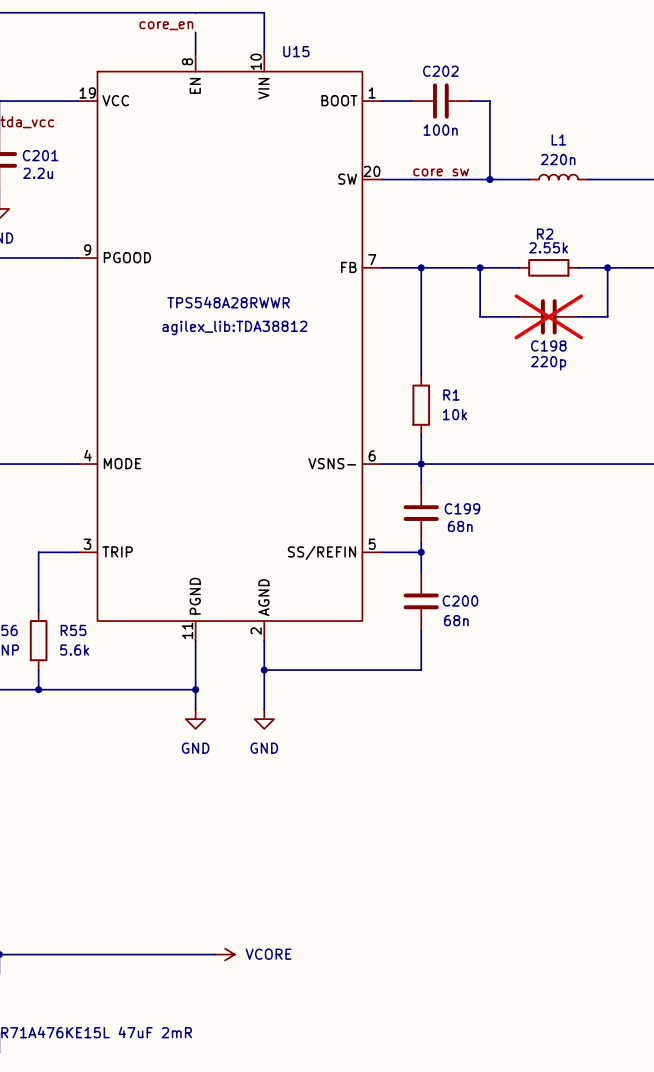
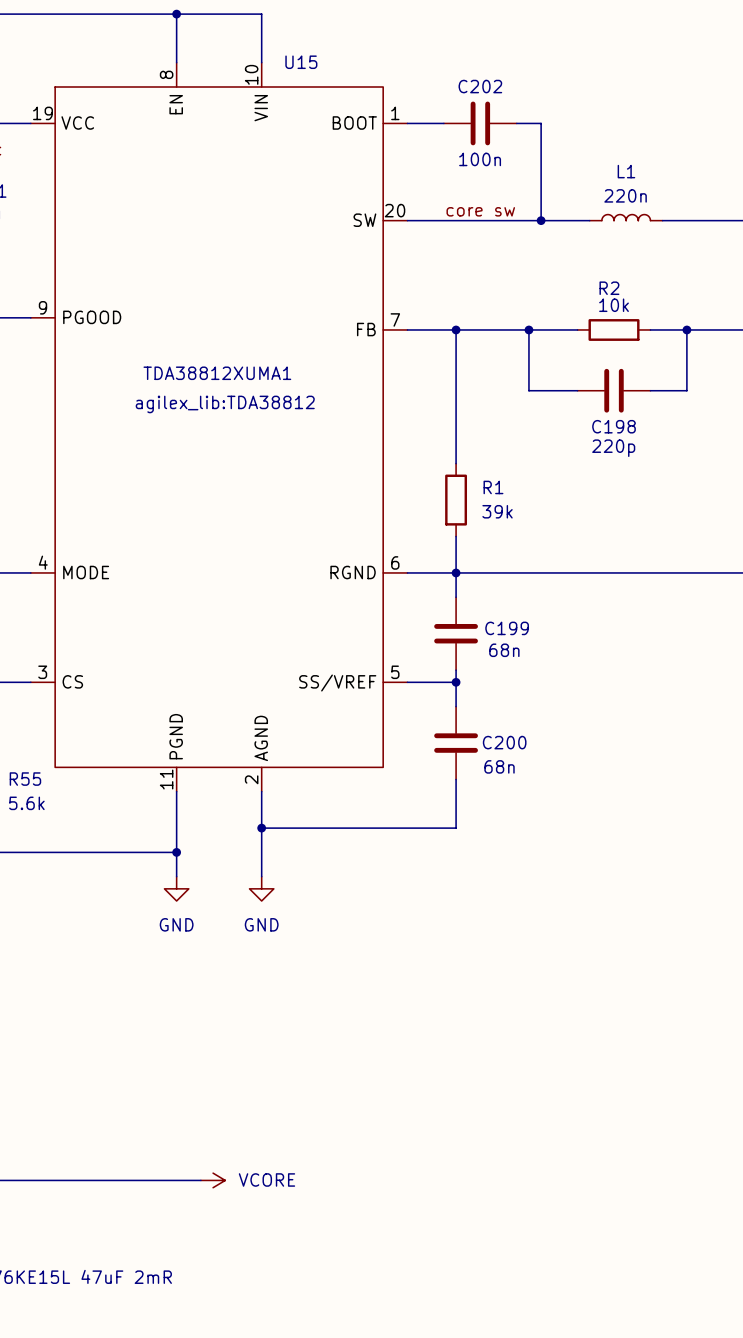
wire: none -> (176, 14) (176, 38)
junction: none -> (176, 14)
label: core_en (166, 25) -> none
R2 value: 2.55k (548, 247) -> 10k (614, 305)
U15 value: TPS548A28RWWR (228, 302) -> TDA38812XUMA1 (217, 373)
C198 do-not-place cross: (548, 316) -> none
R1 value: 10k (454, 414) -> 39k (497, 511)
U15 pin name: VSNS- (332, 463) -> RGND (353, 572)
U15 pin name: TRIP (117, 551) -> CS (72, 681)
U15 pin name: SS/REFIN (321, 552) -> SS/VREF (337, 683)

